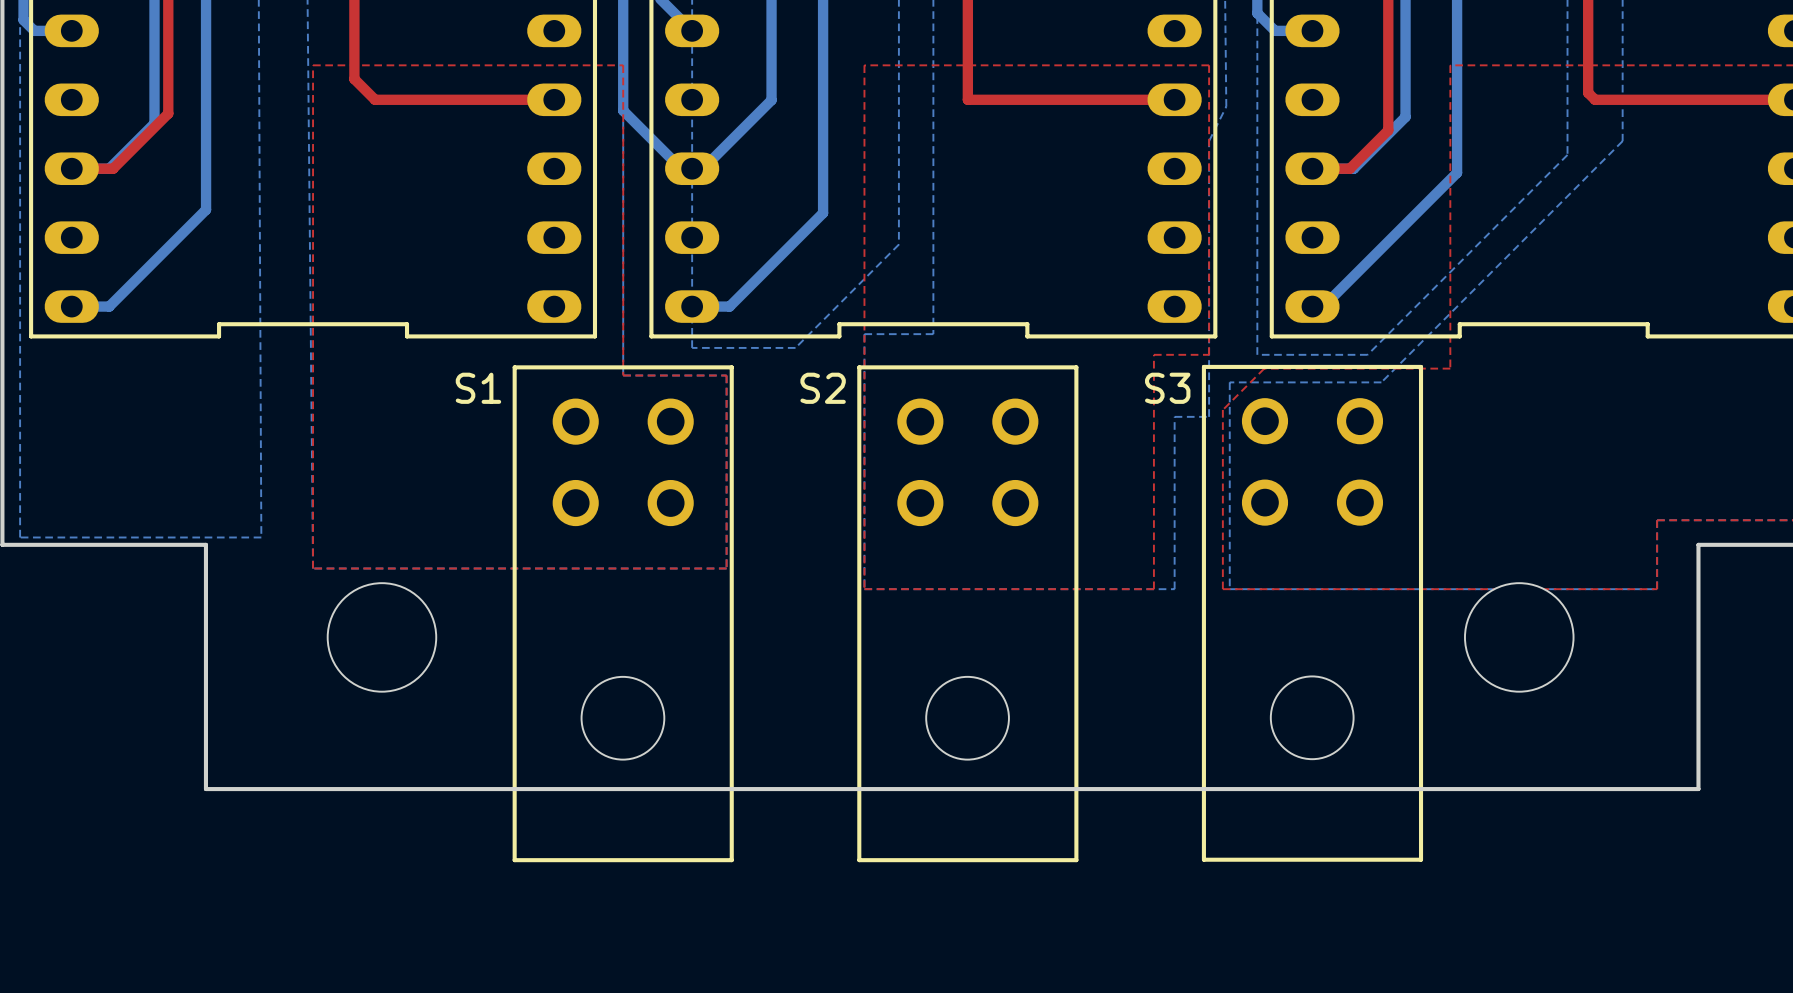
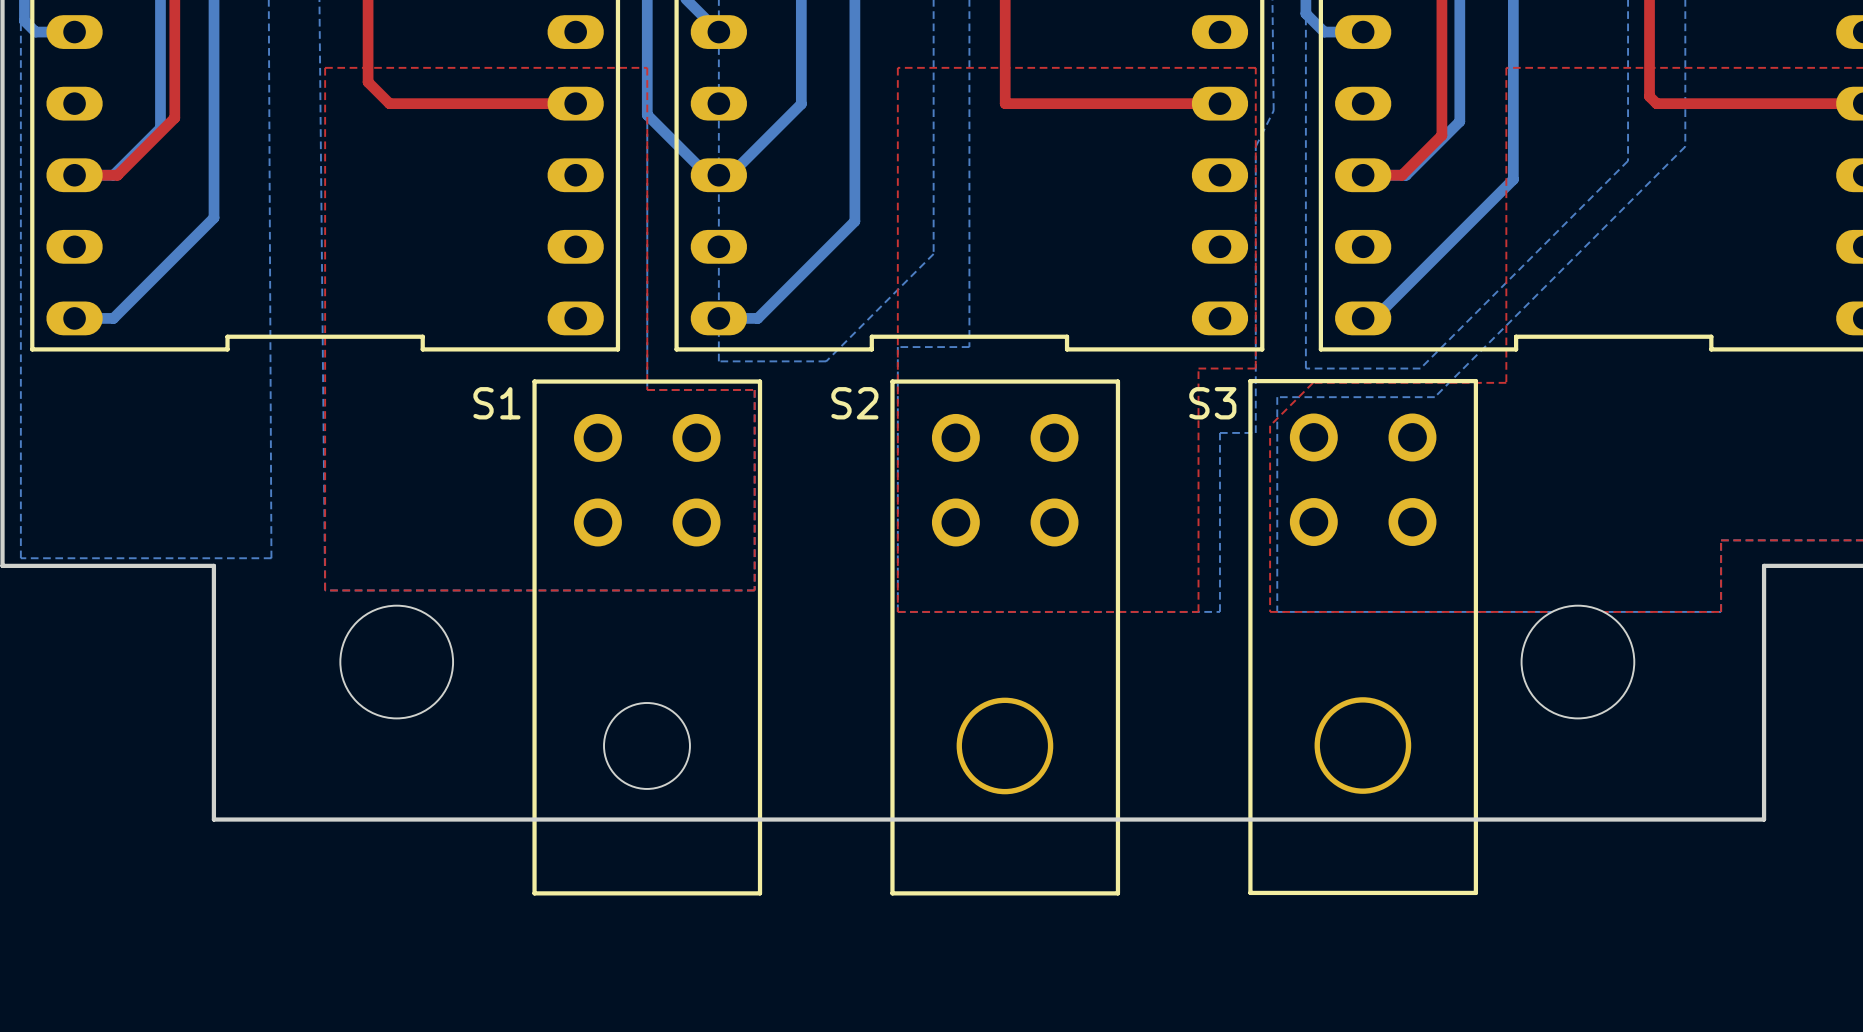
S3 footprint: [1201, 364, 1424, 862] -> [1248, 378, 1479, 896]
S2 footprint: [857, 365, 1079, 863] -> [890, 379, 1121, 896]

